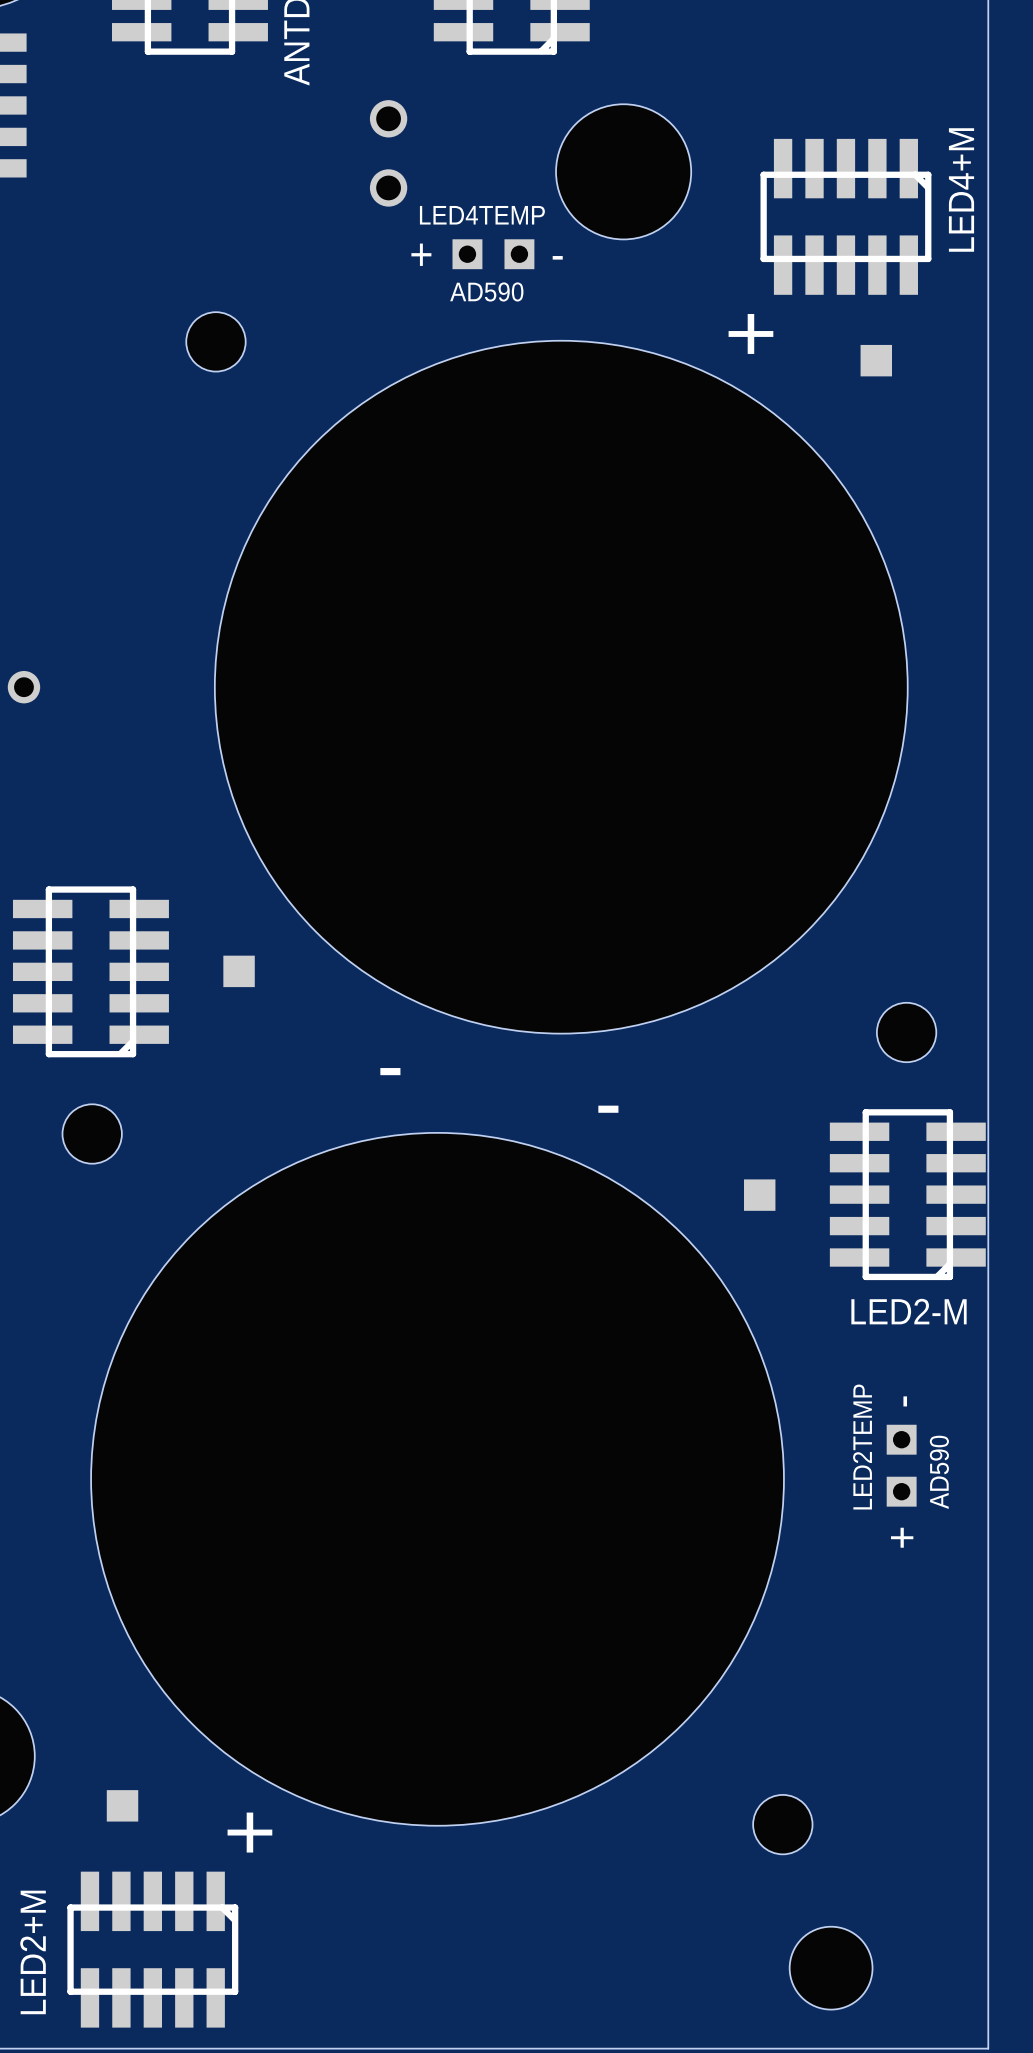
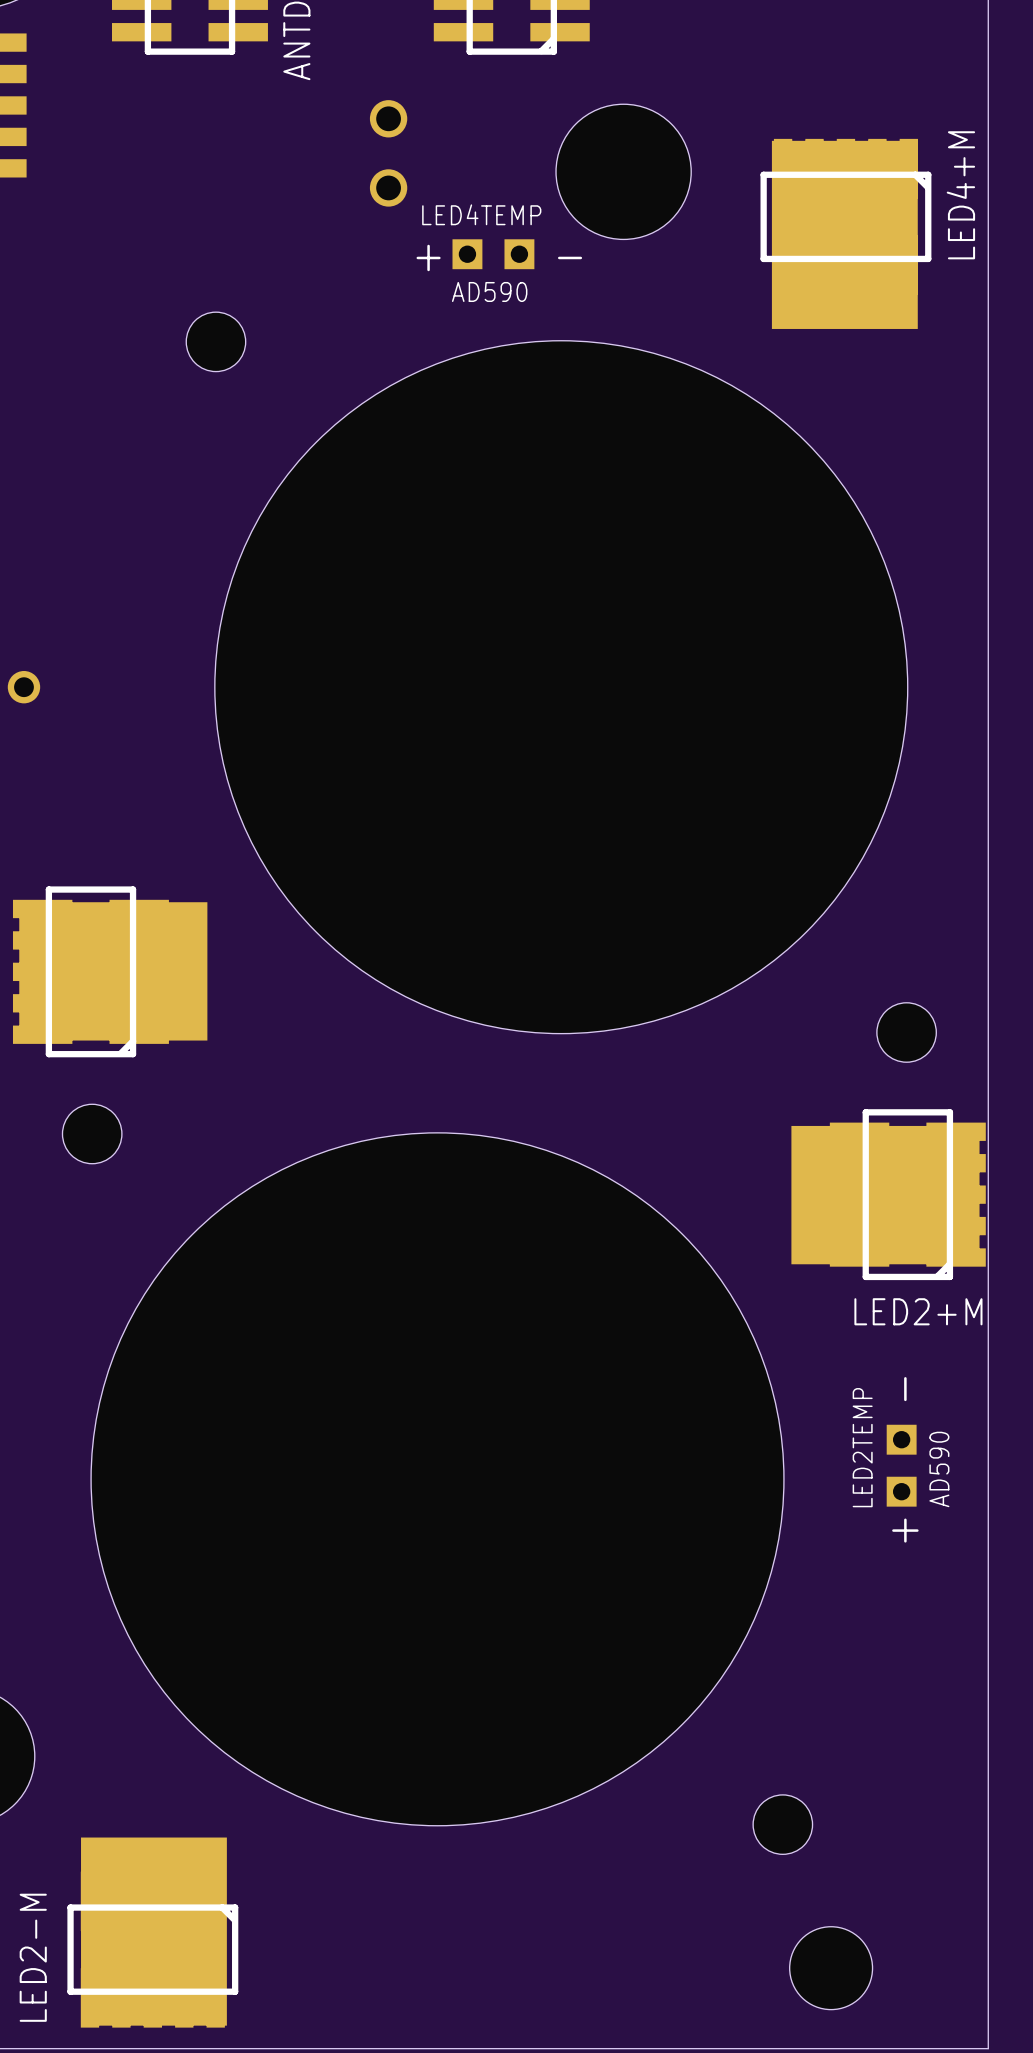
part: none -> (477, 601)
part: (561, 687) -> none
LED2-M name: LED2-M (909, 1311) -> LED2+M (918, 1311)
part: (437, 1479) -> none
part: none -> (521, 1564)
LED2+M name: LED2+M (33, 1952) -> LED2-M (33, 1957)

